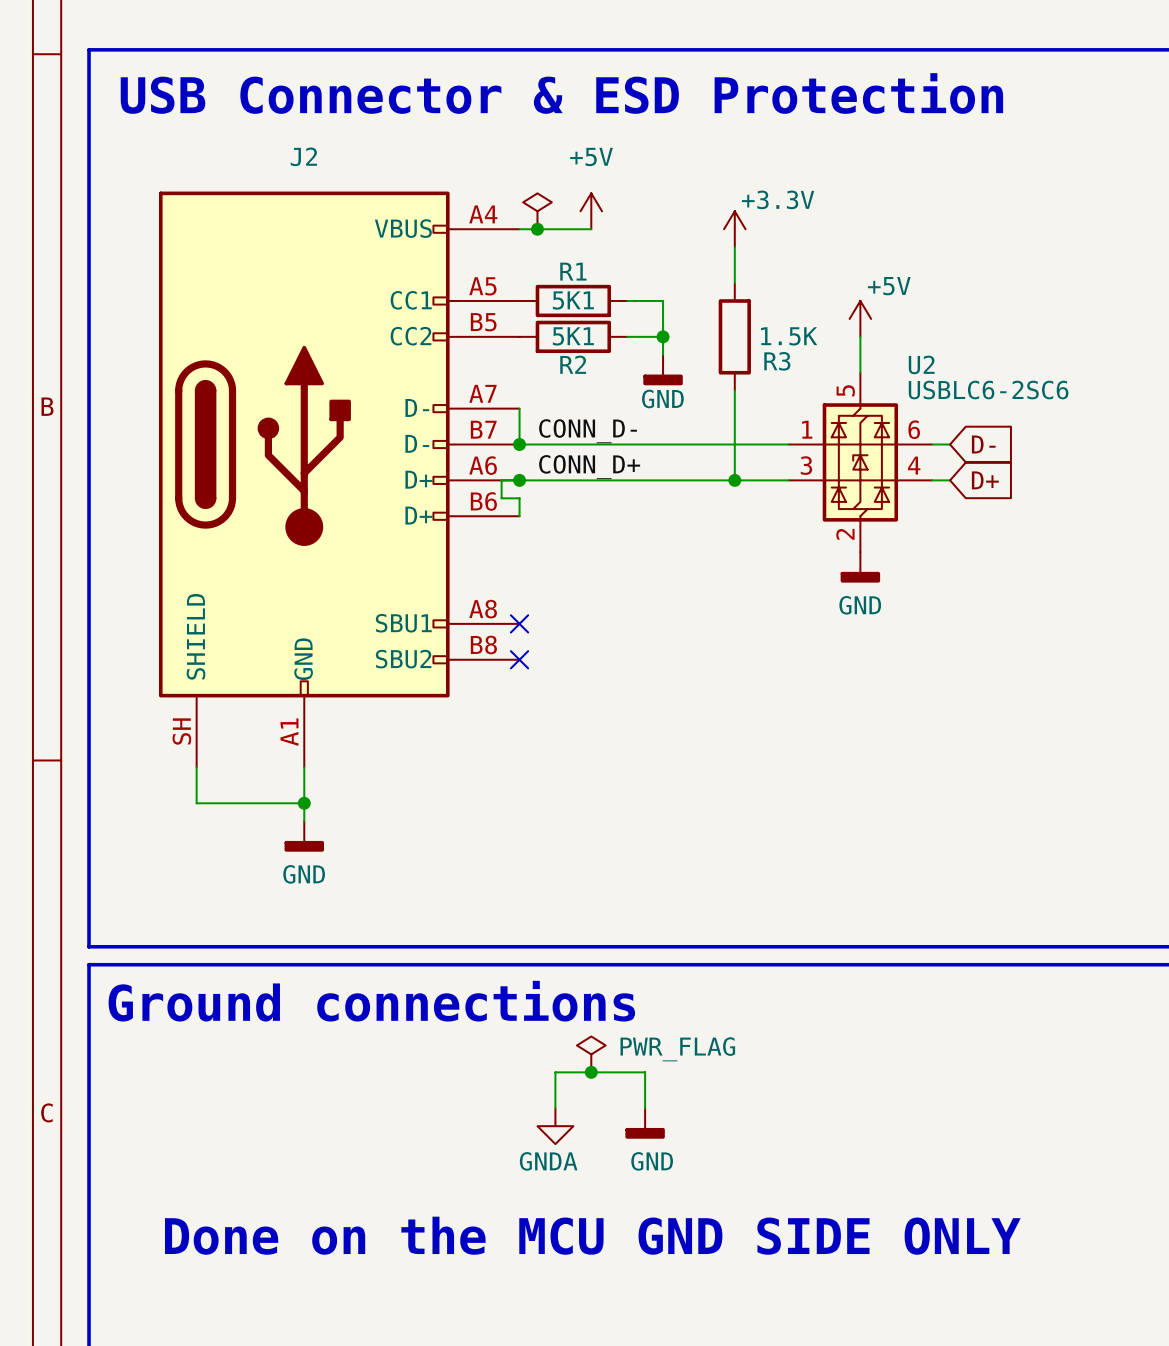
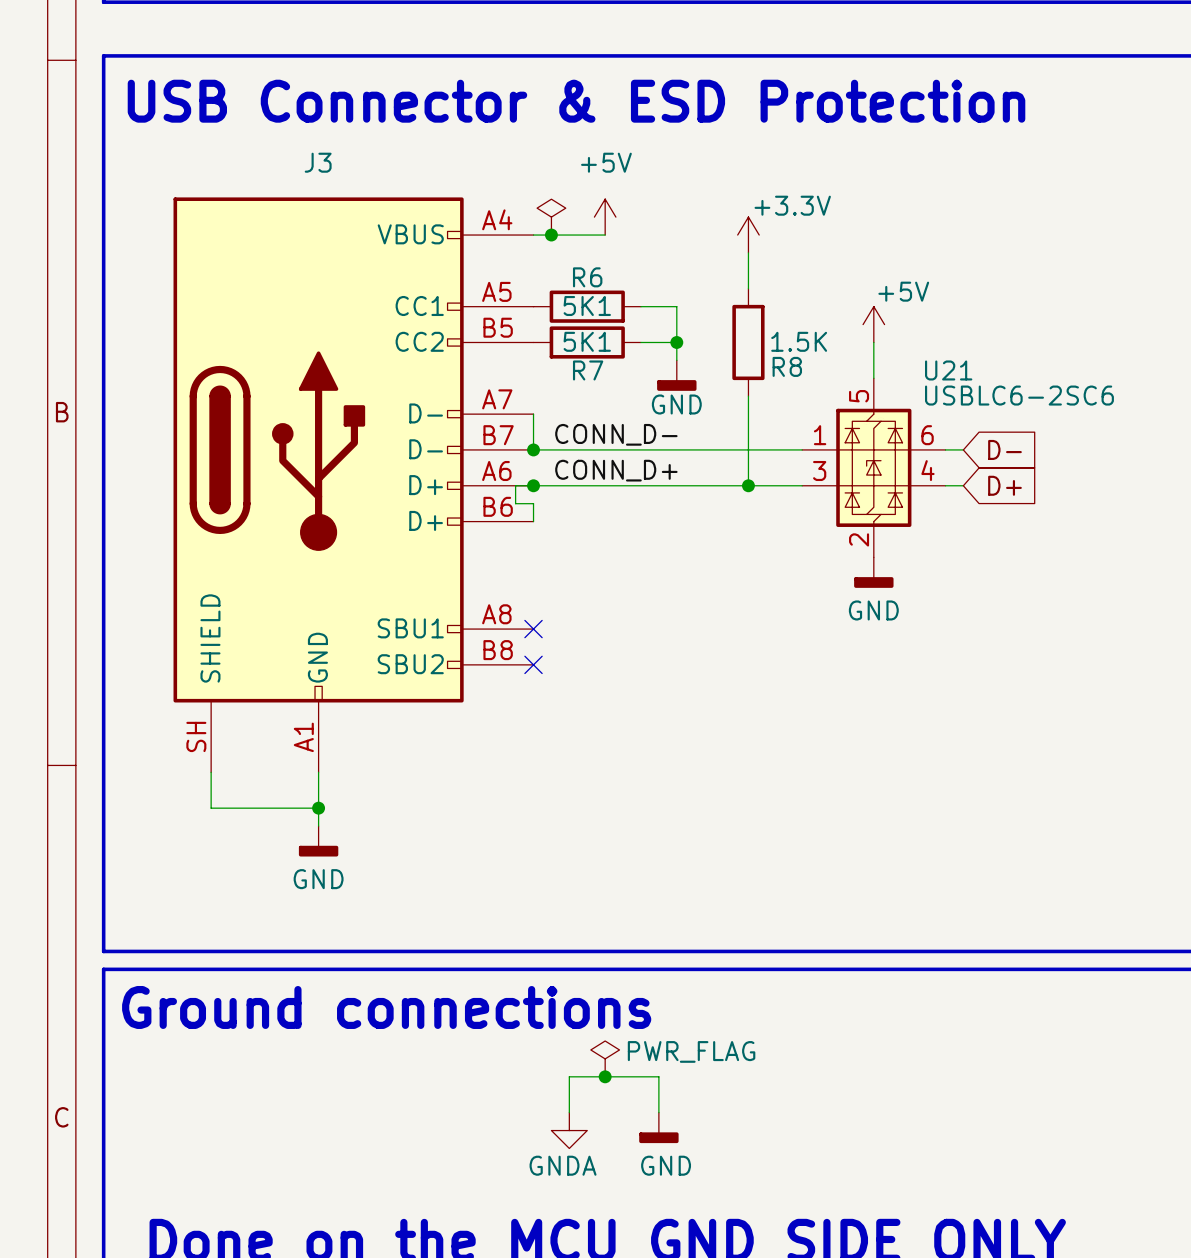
J2 name: J2 (303, 156) -> J3 (318, 162)
R1 name: R1 (573, 271) -> R6 (587, 277)
R3 name: R3 (777, 361) -> R8 (787, 366)
R2 name: R2 (573, 364) -> R7 (588, 370)
U2 name: U2 (921, 364) -> U21 (948, 370)

